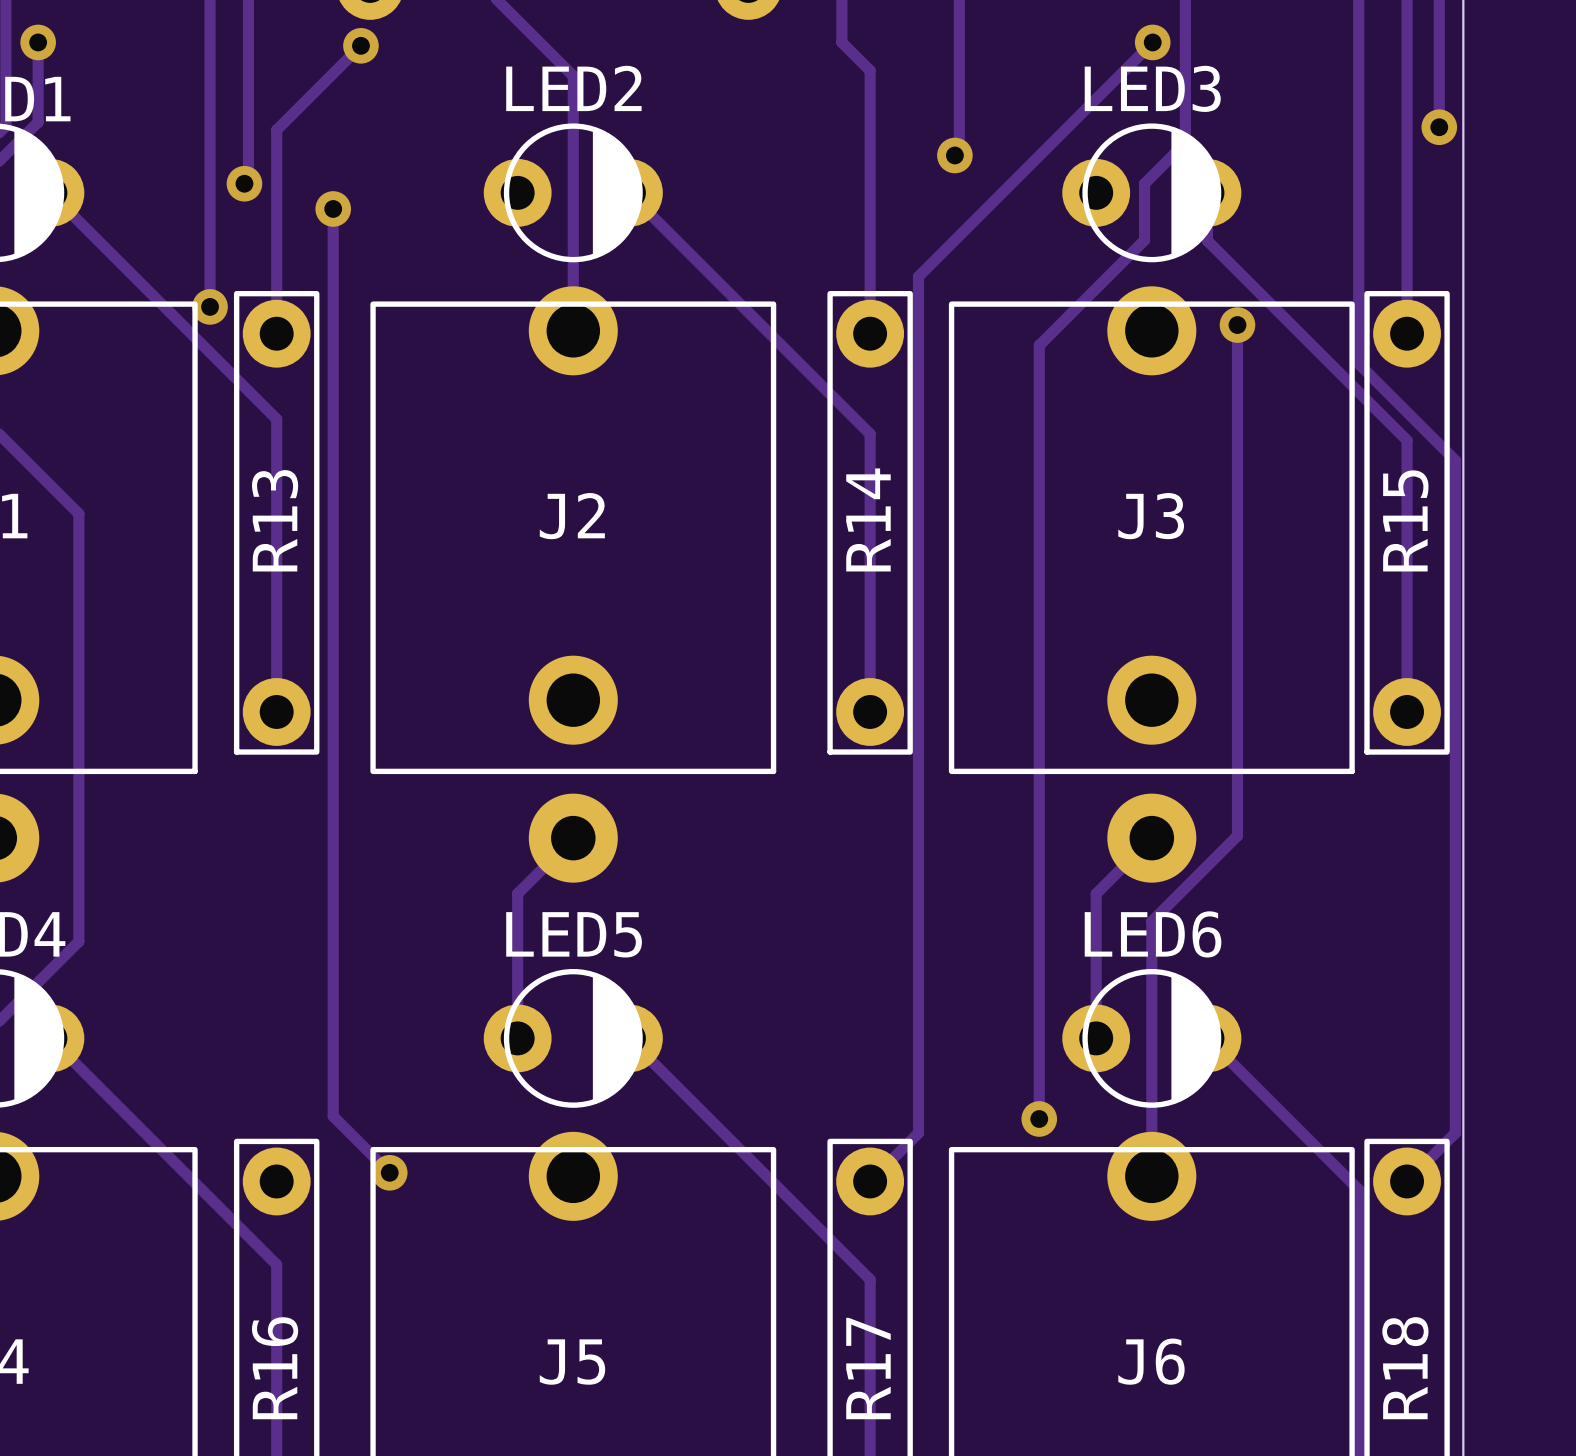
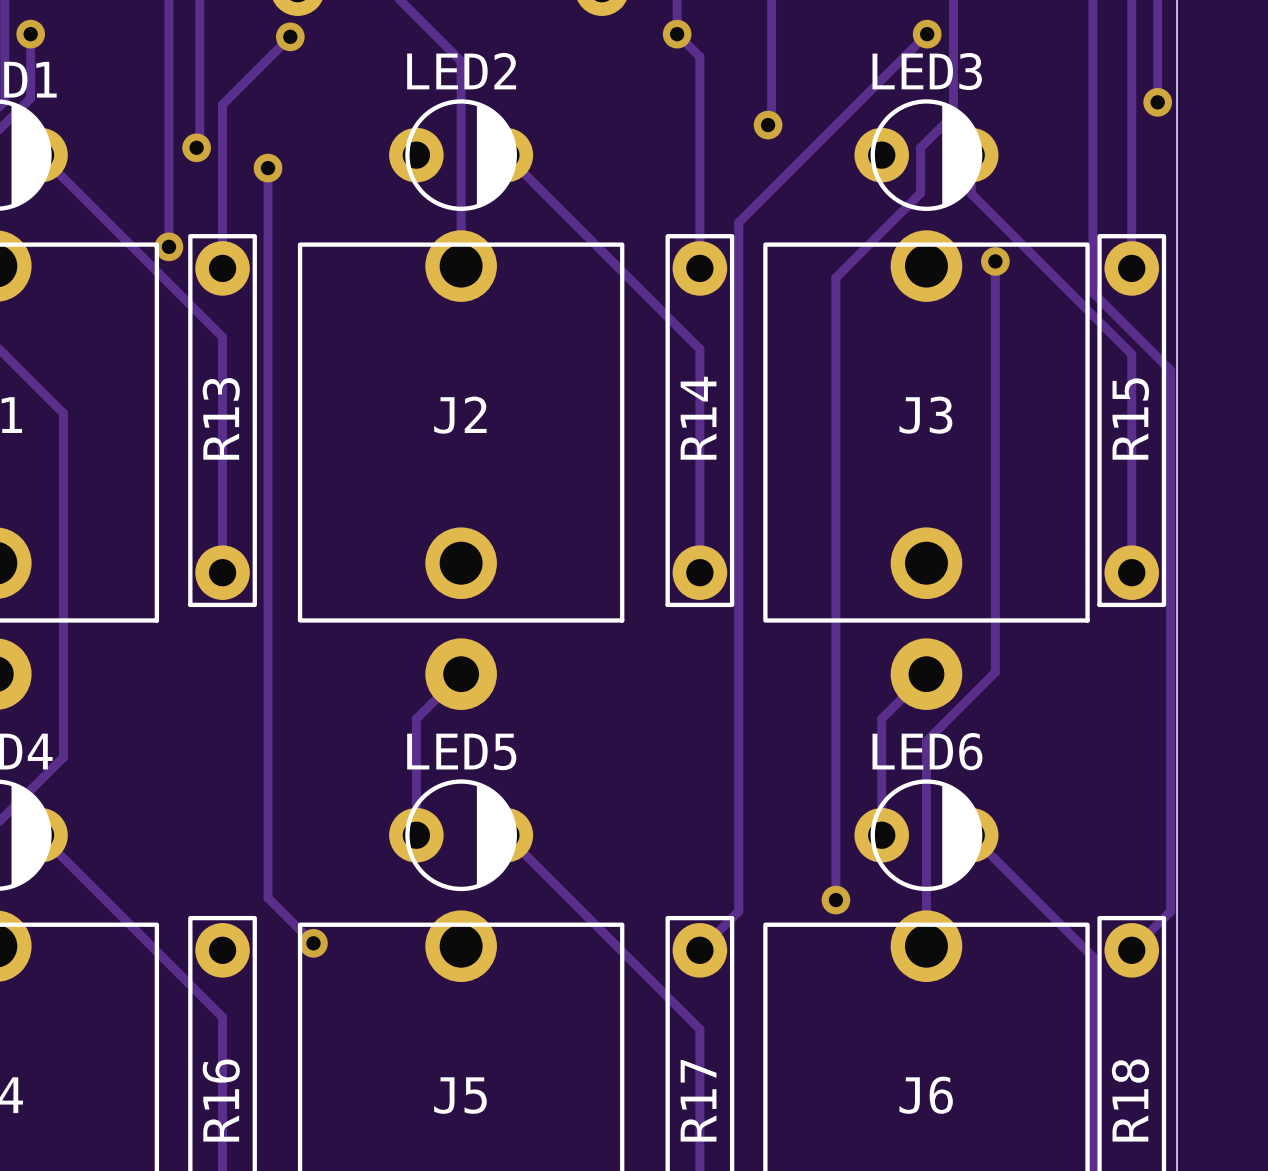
via: none -> (677, 34)

